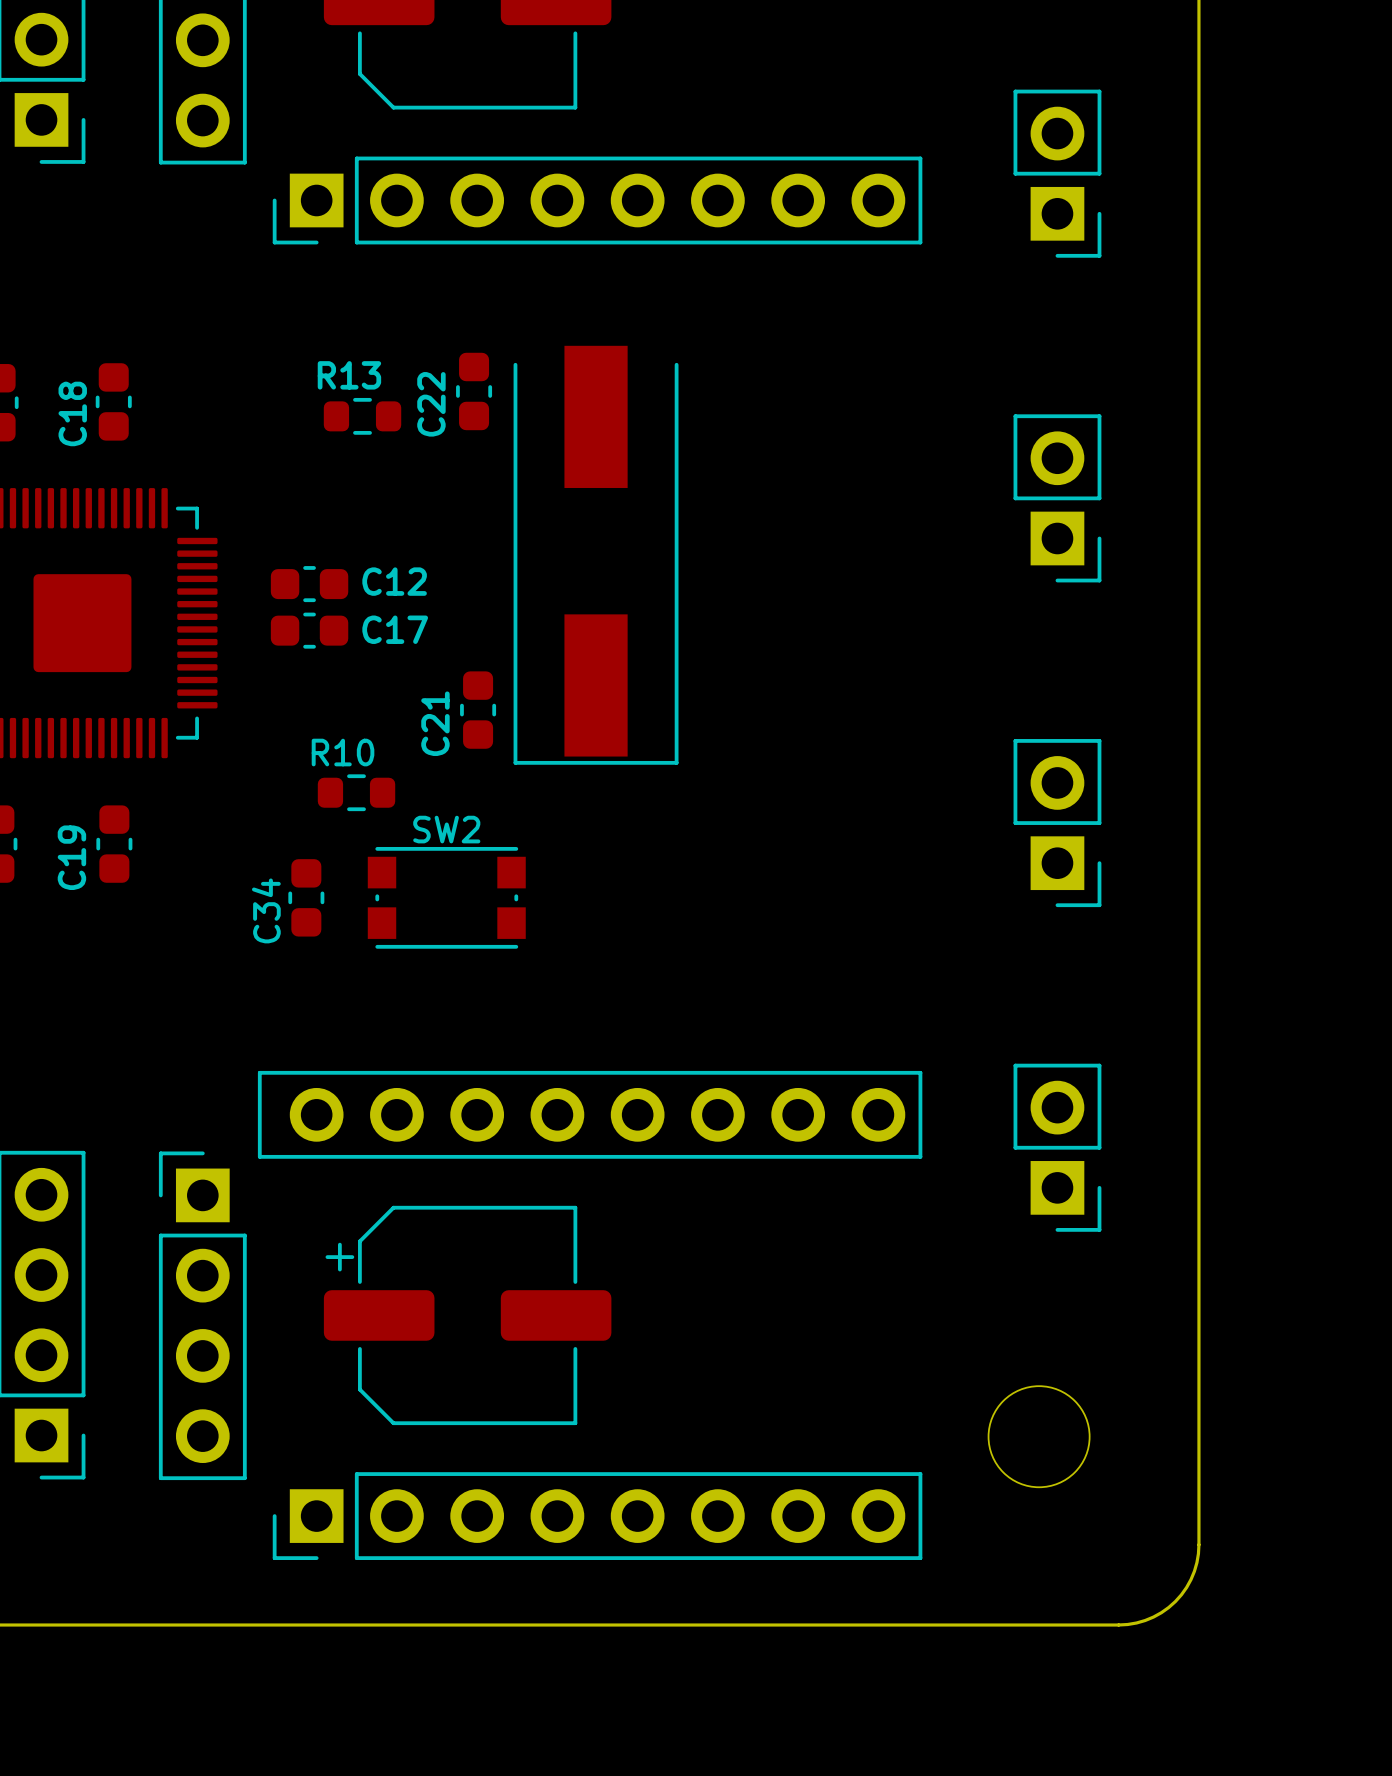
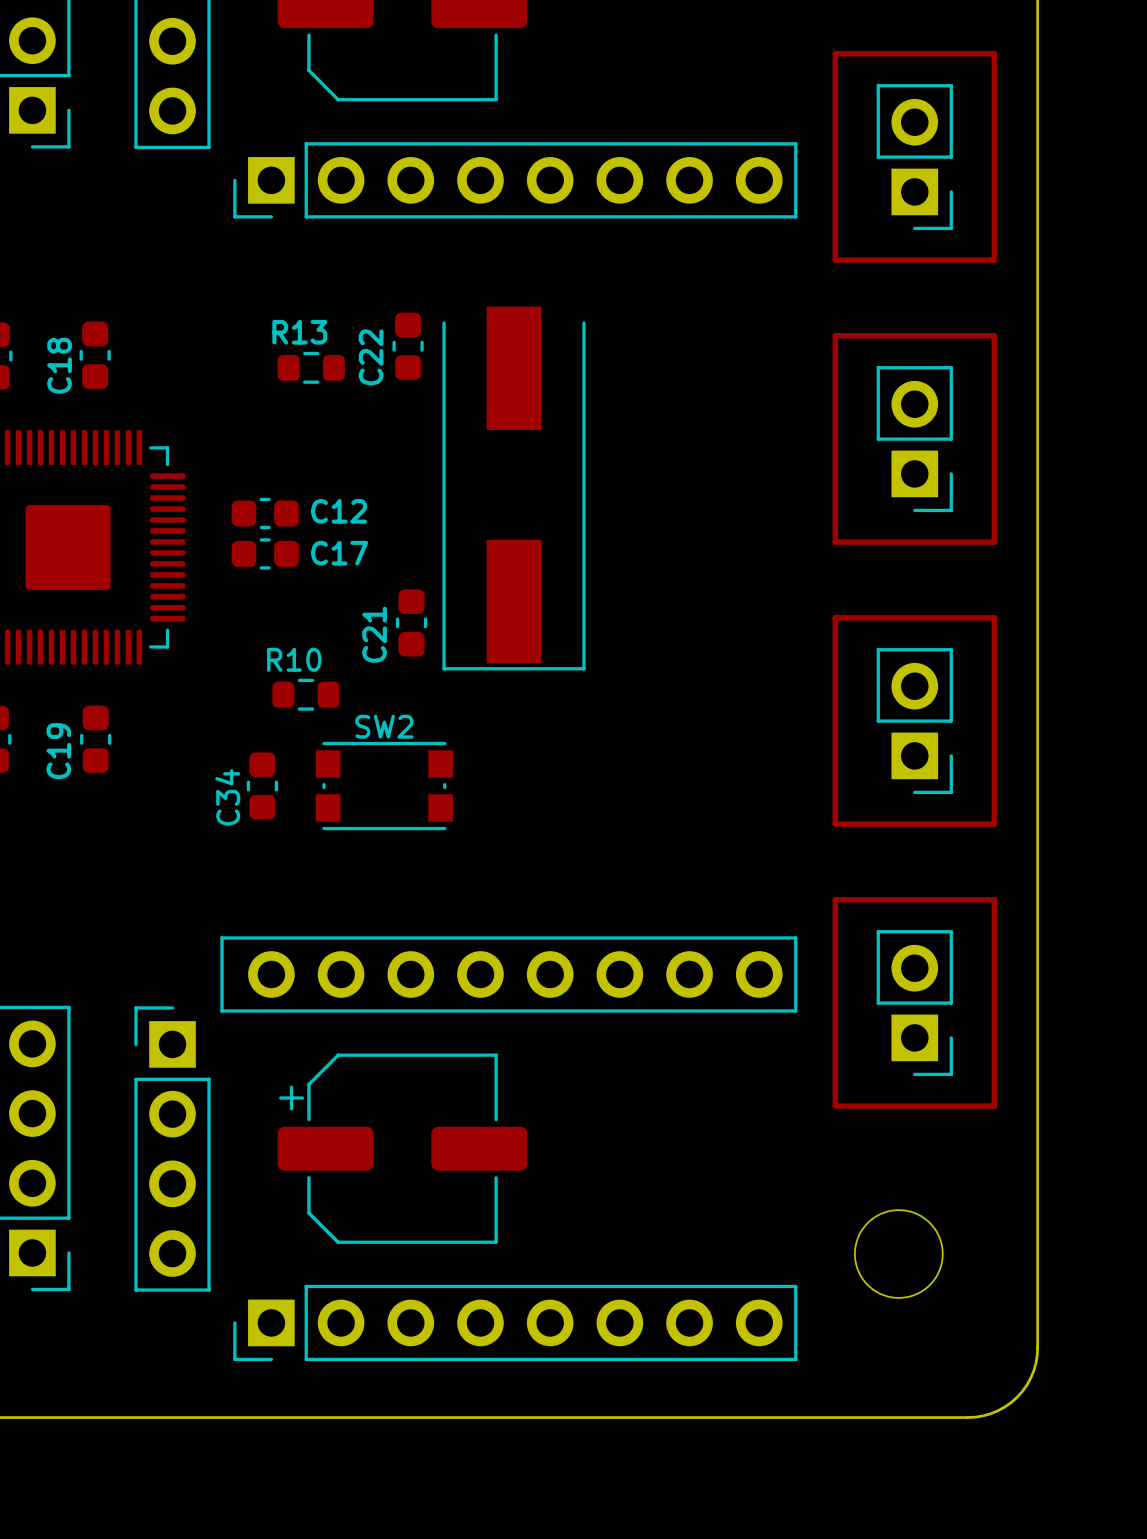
track: none -> (835, 53) (835, 260) (994, 260) (994, 53) (835, 53)
track: none -> (835, 335) (835, 542) (994, 542) (994, 335) (835, 335)
track: none -> (835, 617) (994, 617) (994, 824) (835, 824) (835, 617)
track: none -> (835, 899) (835, 1106) (994, 1106) (994, 899) (835, 899)

